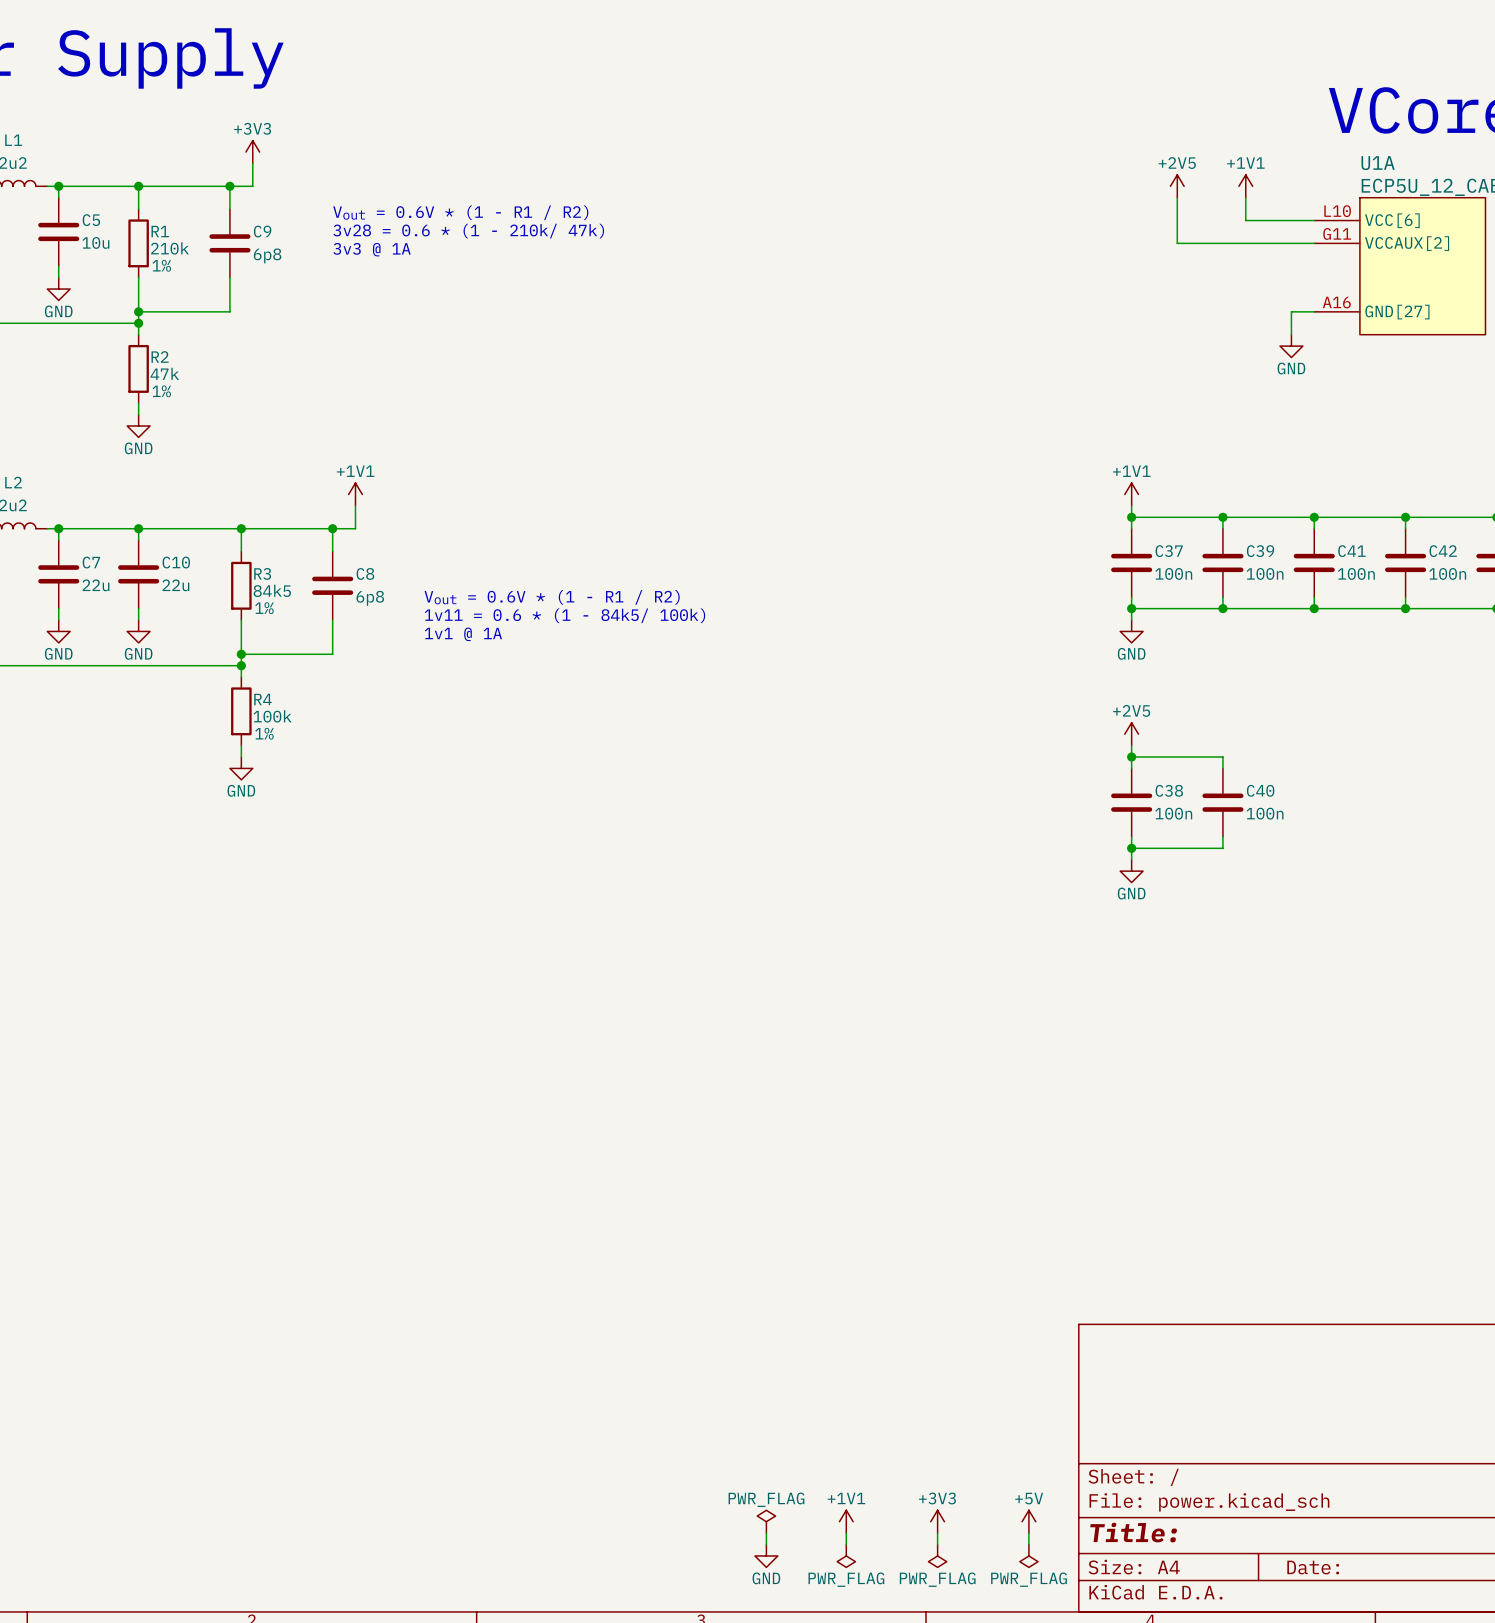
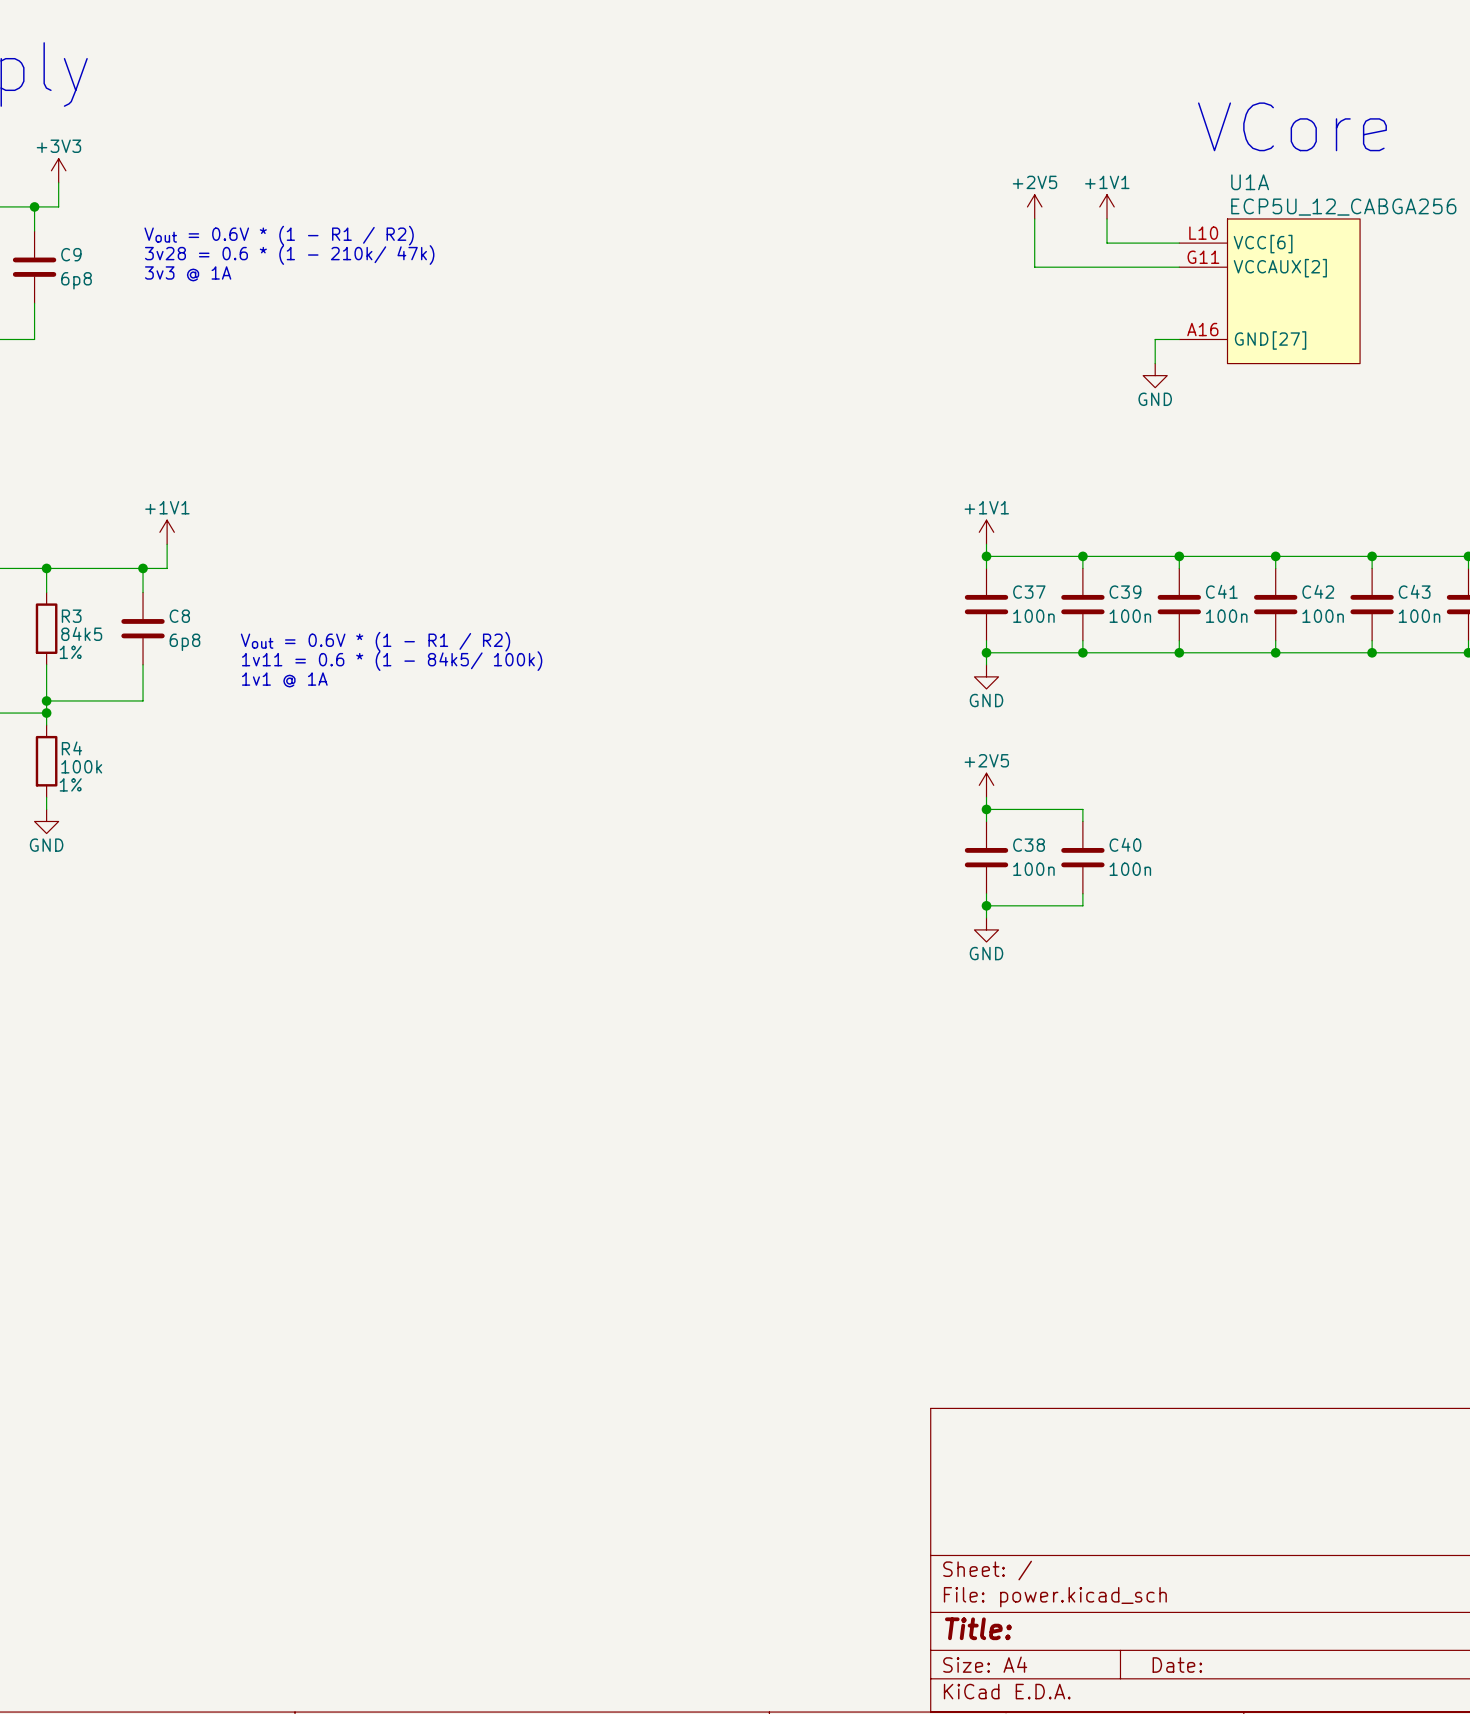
power symbol: PWR_FLAG (766, 1521) -> none
power symbol: +1V1 (846, 1521) -> none
power symbol: +3V3 (937, 1521) -> none
power symbol: +5V (1028, 1521) -> none
wire: (766, 1533) (766, 1544) -> none
wire: (846, 1533) (846, 1544) -> none
wire: (937, 1533) (937, 1544) -> none
wire: (1028, 1533) (1028, 1544) -> none
power symbol: GND (766, 1555) -> none
power symbol: PWR_FLAG (846, 1555) -> none
power symbol: PWR_FLAG (937, 1555) -> none
power symbol: PWR_FLAG (1028, 1555) -> none

